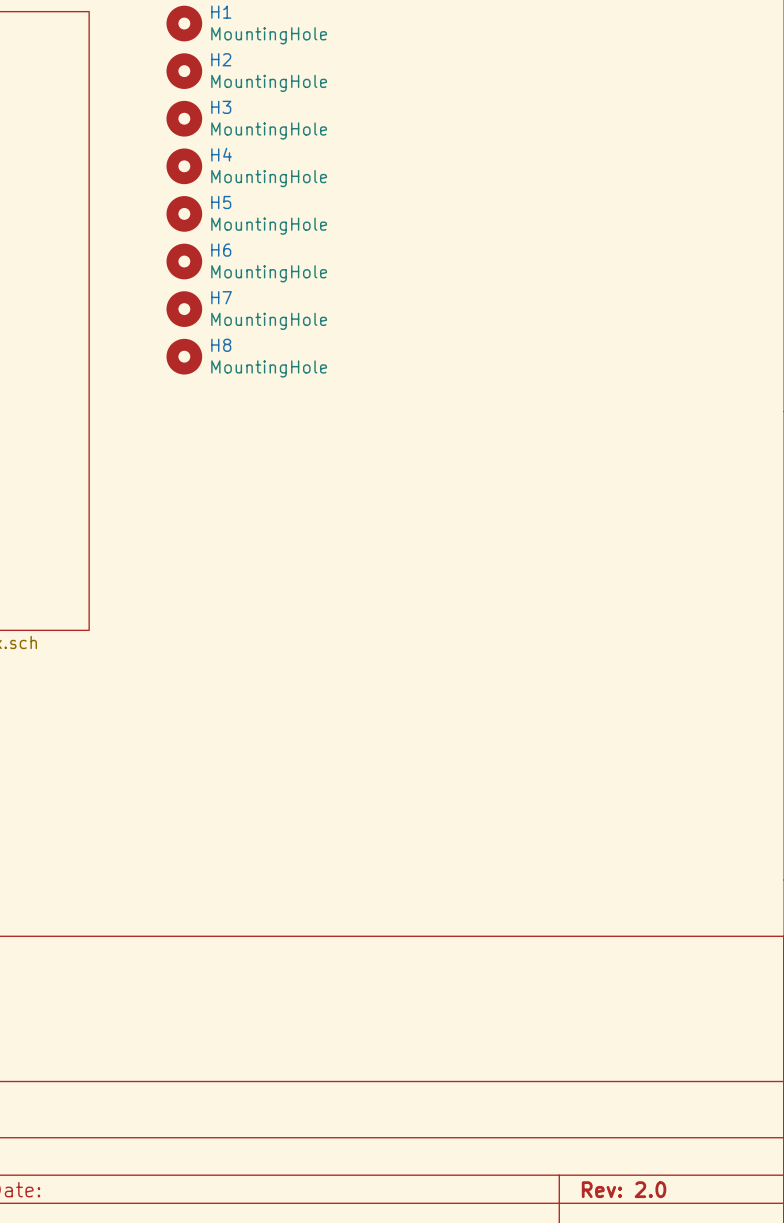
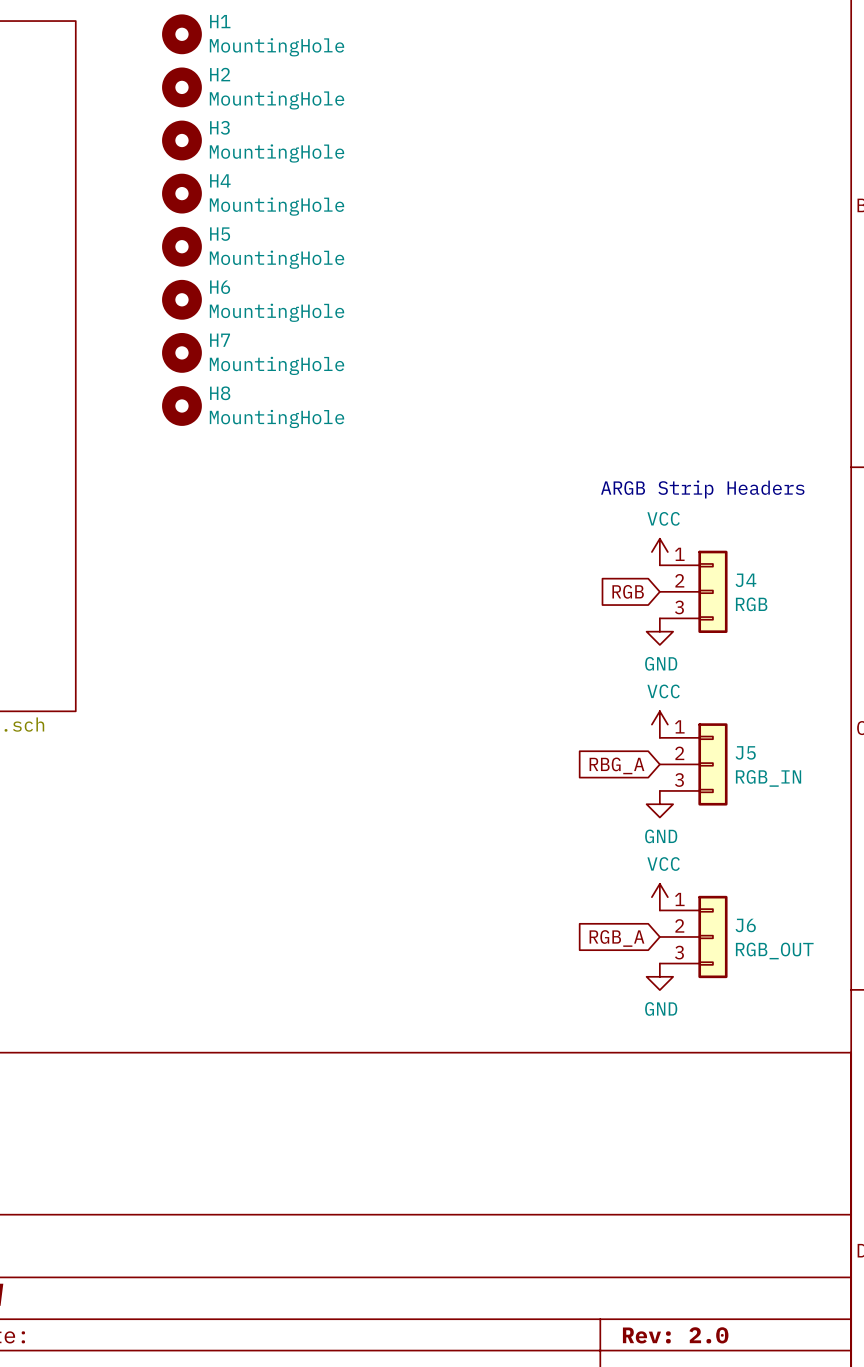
text: none -> ARGB Strip Headers (702, 489)
power symbol: none -> VCC (659, 552)
global label: none -> RGB (628, 591)
J4: none -> RGB (693, 591)
power symbol: none -> GND (659, 631)
power symbol: none -> VCC (659, 724)
J5: none -> RGB_IN (693, 764)
global label: none -> RBG_A (616, 765)
power symbol: none -> GND (659, 804)
power symbol: none -> VCC (659, 897)
J6: none -> RGB_OUT (693, 936)
global label: none -> RGB_A (616, 938)
power symbol: none -> GND (659, 976)

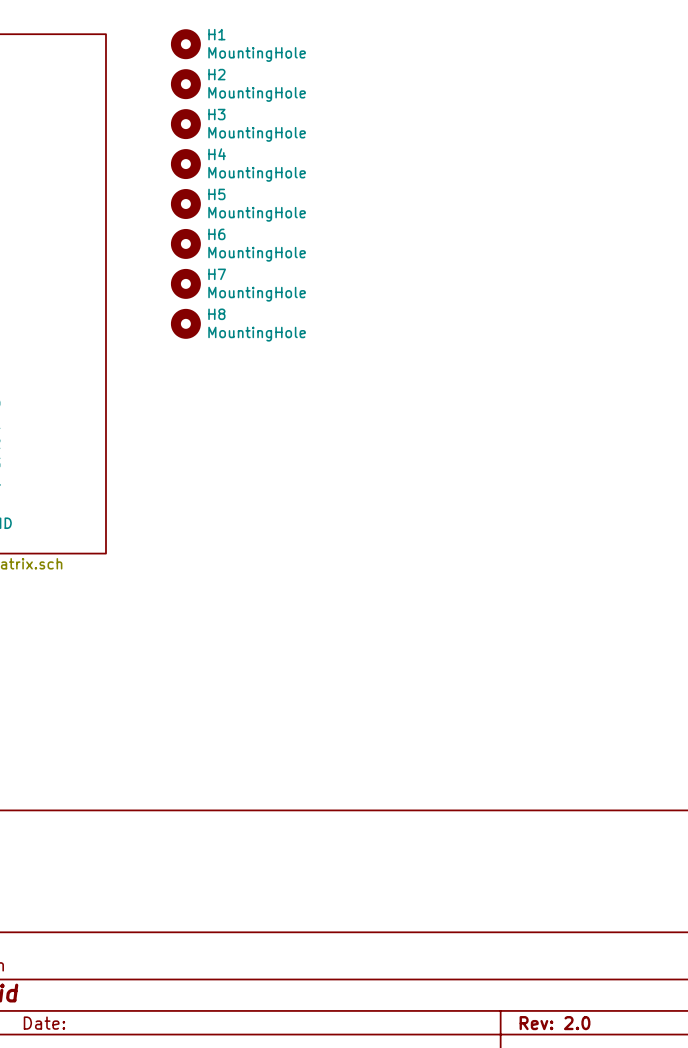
text: ARGB Strip Headers (702, 489) -> none
power symbol: VCC (659, 552) -> none
global label: RGB (628, 591) -> none
J4: RGB (693, 591) -> none
power symbol: GND (659, 631) -> none
power symbol: VCC (659, 724) -> none
J5: RGB_IN (693, 764) -> none
global label: RBG_A (616, 765) -> none
power symbol: GND (659, 804) -> none
power symbol: VCC (659, 897) -> none
J6: RGB_OUT (693, 936) -> none
global label: RGB_A (616, 938) -> none
power symbol: GND (659, 976) -> none

